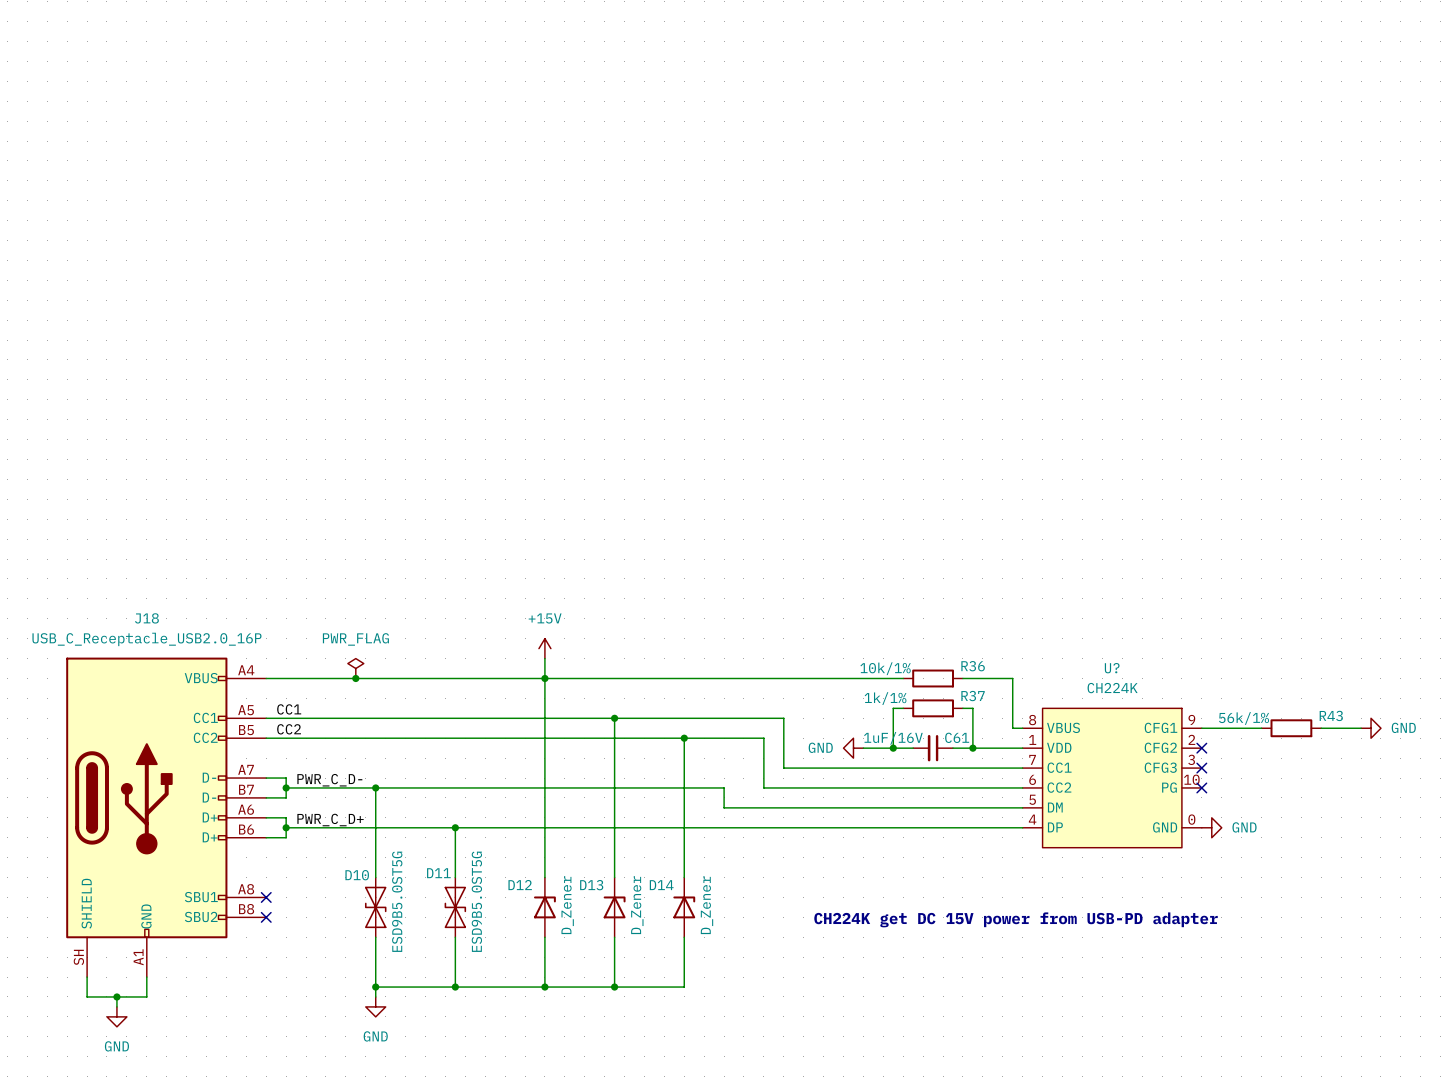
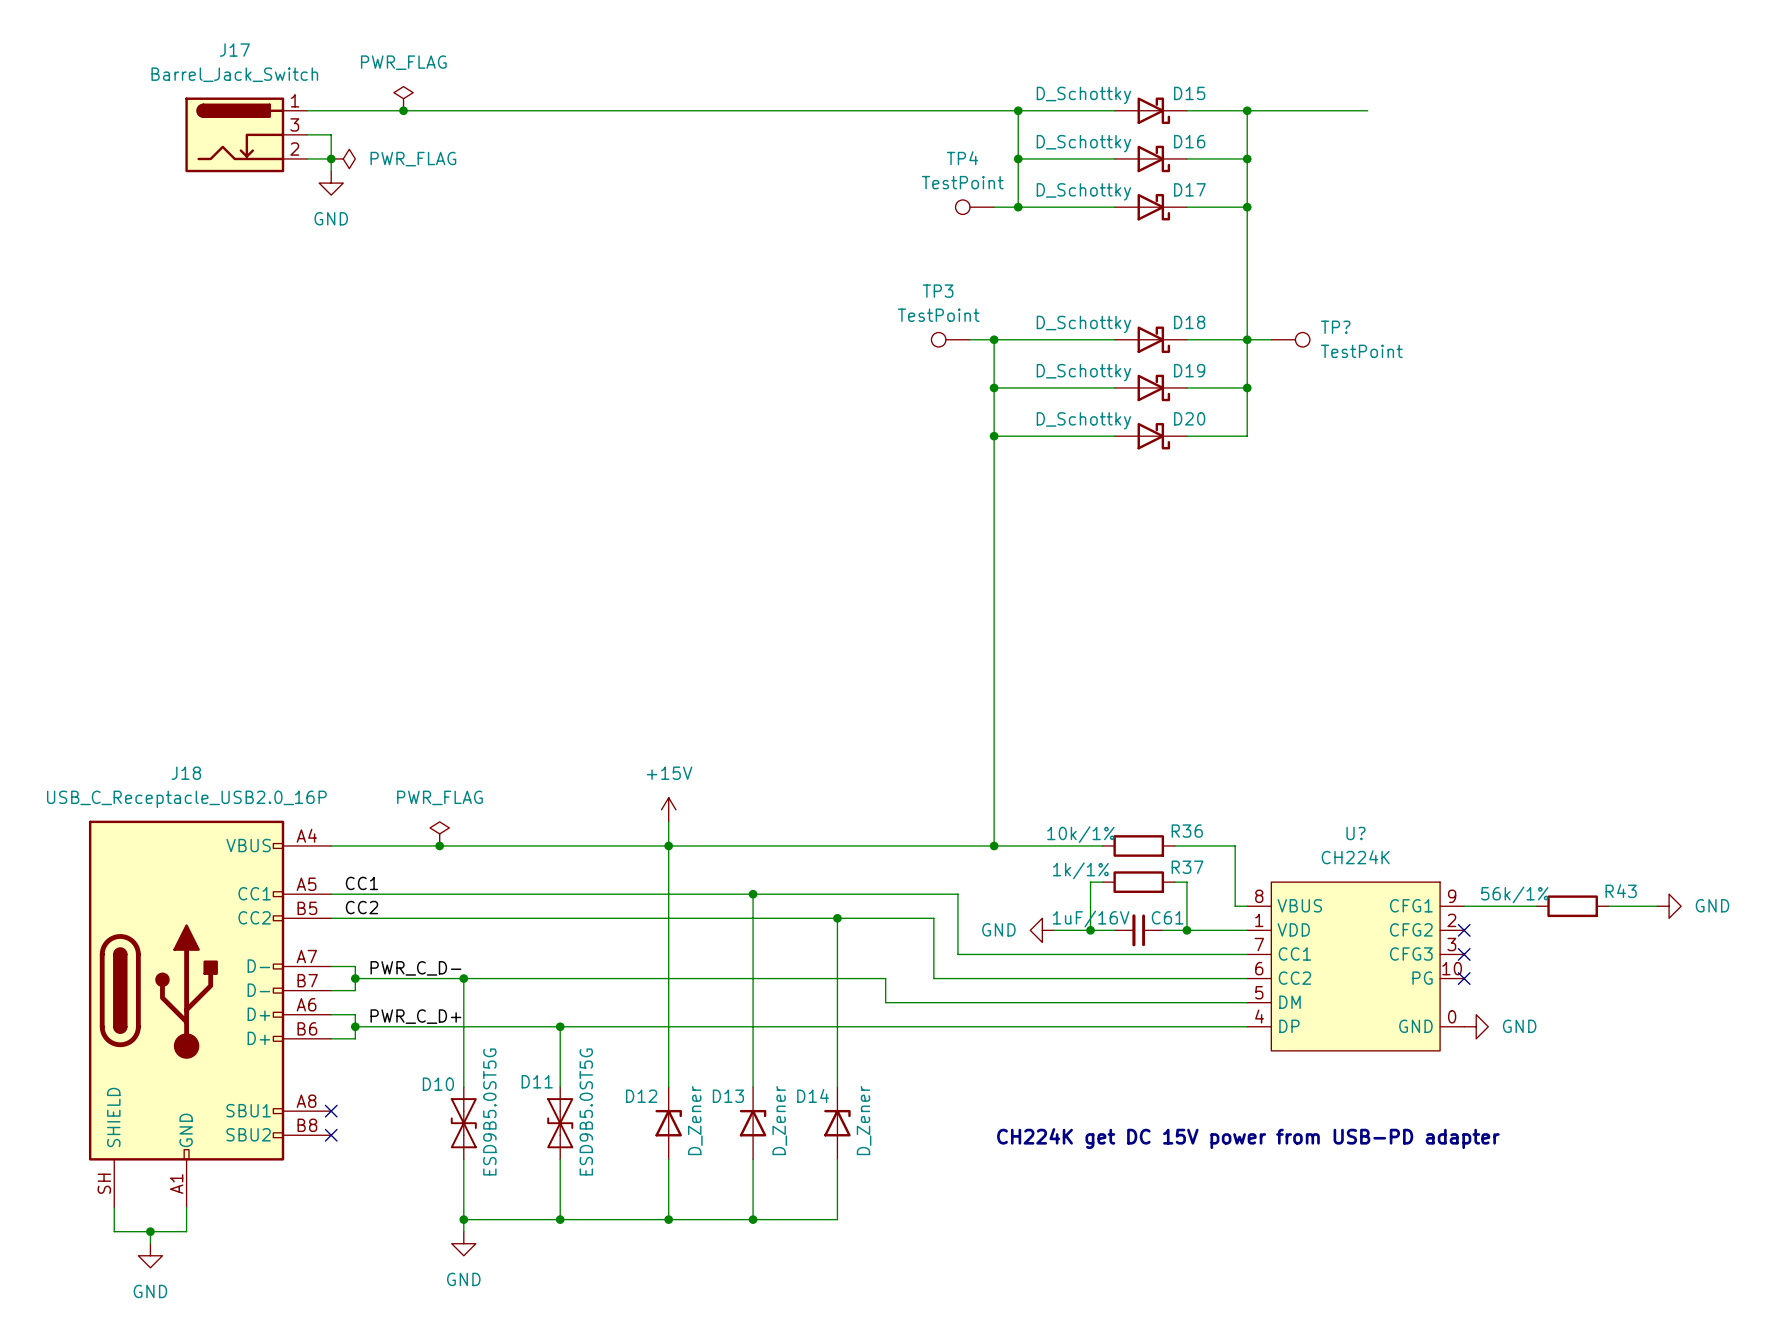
power symbol: none -> PWR_FLAG (403, 98)
wire: none -> (307, 110) (1114, 110)
junction: none -> (403, 110)
wire: none -> (1018, 110) (1018, 207)
junction: none -> (1018, 110)
D15: none -> D_Schottky (1150, 110)
wire: none -> (1186, 110) (1367, 110)
wire: none -> (1247, 110) (1247, 436) (1186, 436)
junction: none -> (1247, 110)
J17: none -> Barrel_Jack_Switch (246, 134)
wire: none -> (307, 134) (331, 134) (331, 171)
wire: none -> (307, 158) (331, 158)
junction: none -> (331, 158)
power symbol: none -> PWR_FLAG (343, 158)
wire: none -> (1018, 158) (1114, 158)
junction: none -> (1018, 158)
D16: none -> D_Schottky (1150, 158)
wire: none -> (1186, 158) (1247, 158)
junction: none -> (1247, 158)
power symbol: none -> GND (331, 183)
TP4: none -> TestPoint (974, 207)
wire: none -> (994, 207) (1114, 207)
junction: none -> (1018, 207)
D17: none -> D_Schottky (1150, 207)
wire: none -> (1186, 207) (1247, 207)
junction: none -> (1247, 207)
TP3: none -> TestPoint (950, 339)
wire: none -> (970, 339) (1114, 339)
wire: none -> (994, 339) (994, 845)
junction: none -> (994, 339)
D18: none -> D_Schottky (1150, 339)
wire: none -> (1186, 339) (1271, 339)
junction: none -> (1247, 339)
TP?: none -> TestPoint (1290, 339)
wire: none -> (994, 387) (1114, 387)
junction: none -> (994, 387)
D19: none -> D_Schottky (1150, 387)
wire: none -> (1186, 387) (1247, 387)
junction: none -> (1247, 387)
wire: none -> (994, 436) (1114, 436)
junction: none -> (994, 436)
D20: none -> D_Schottky (1150, 436)
junction: none -> (994, 845)

